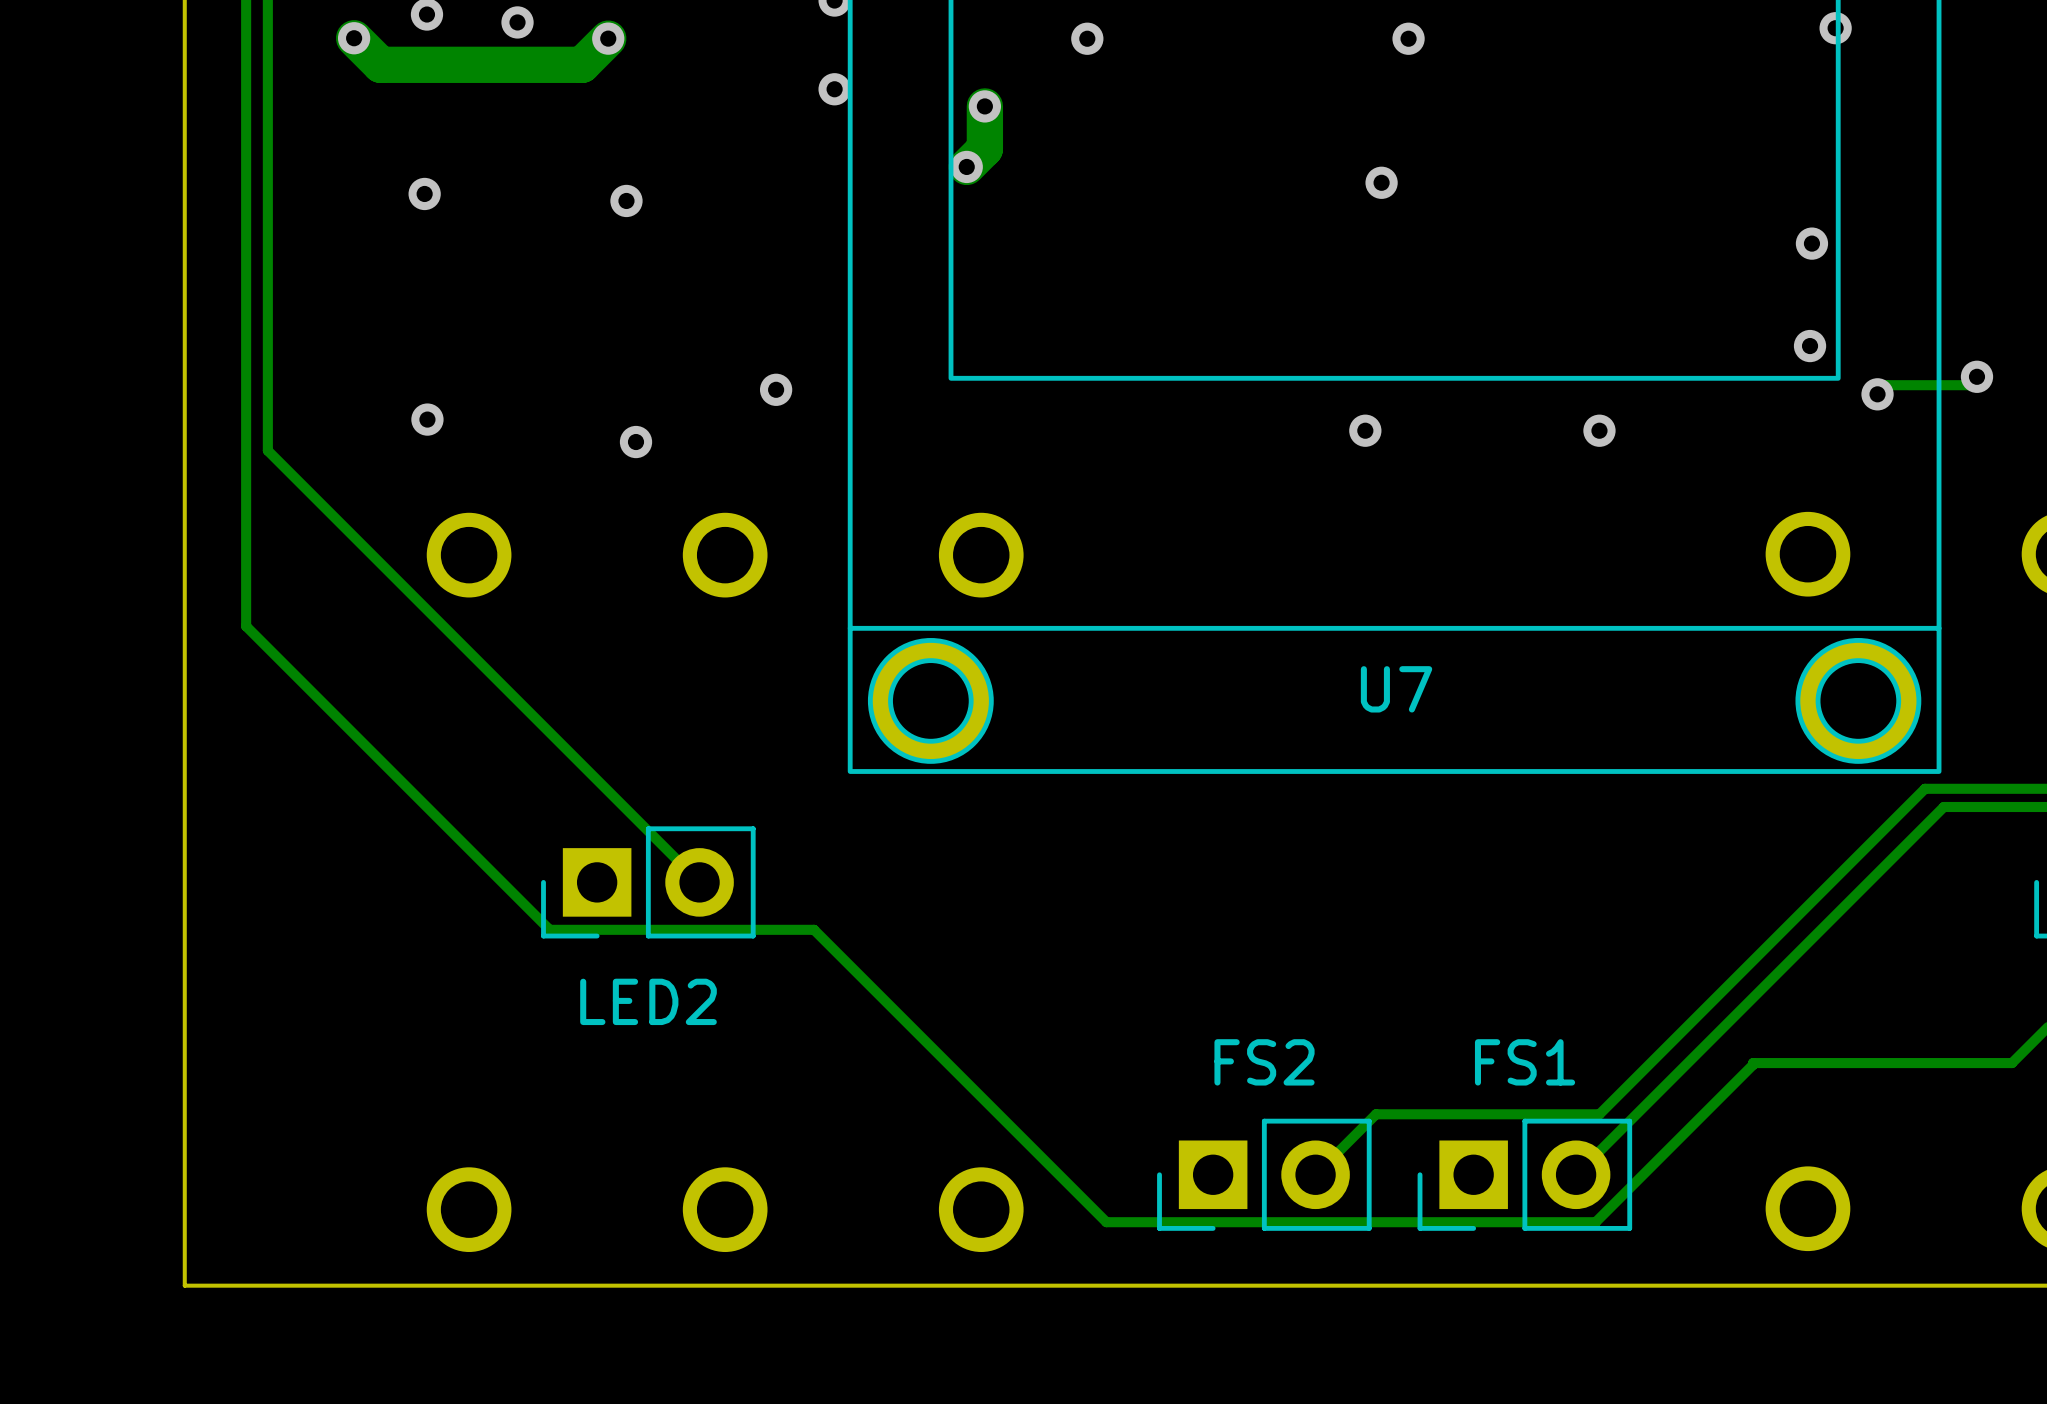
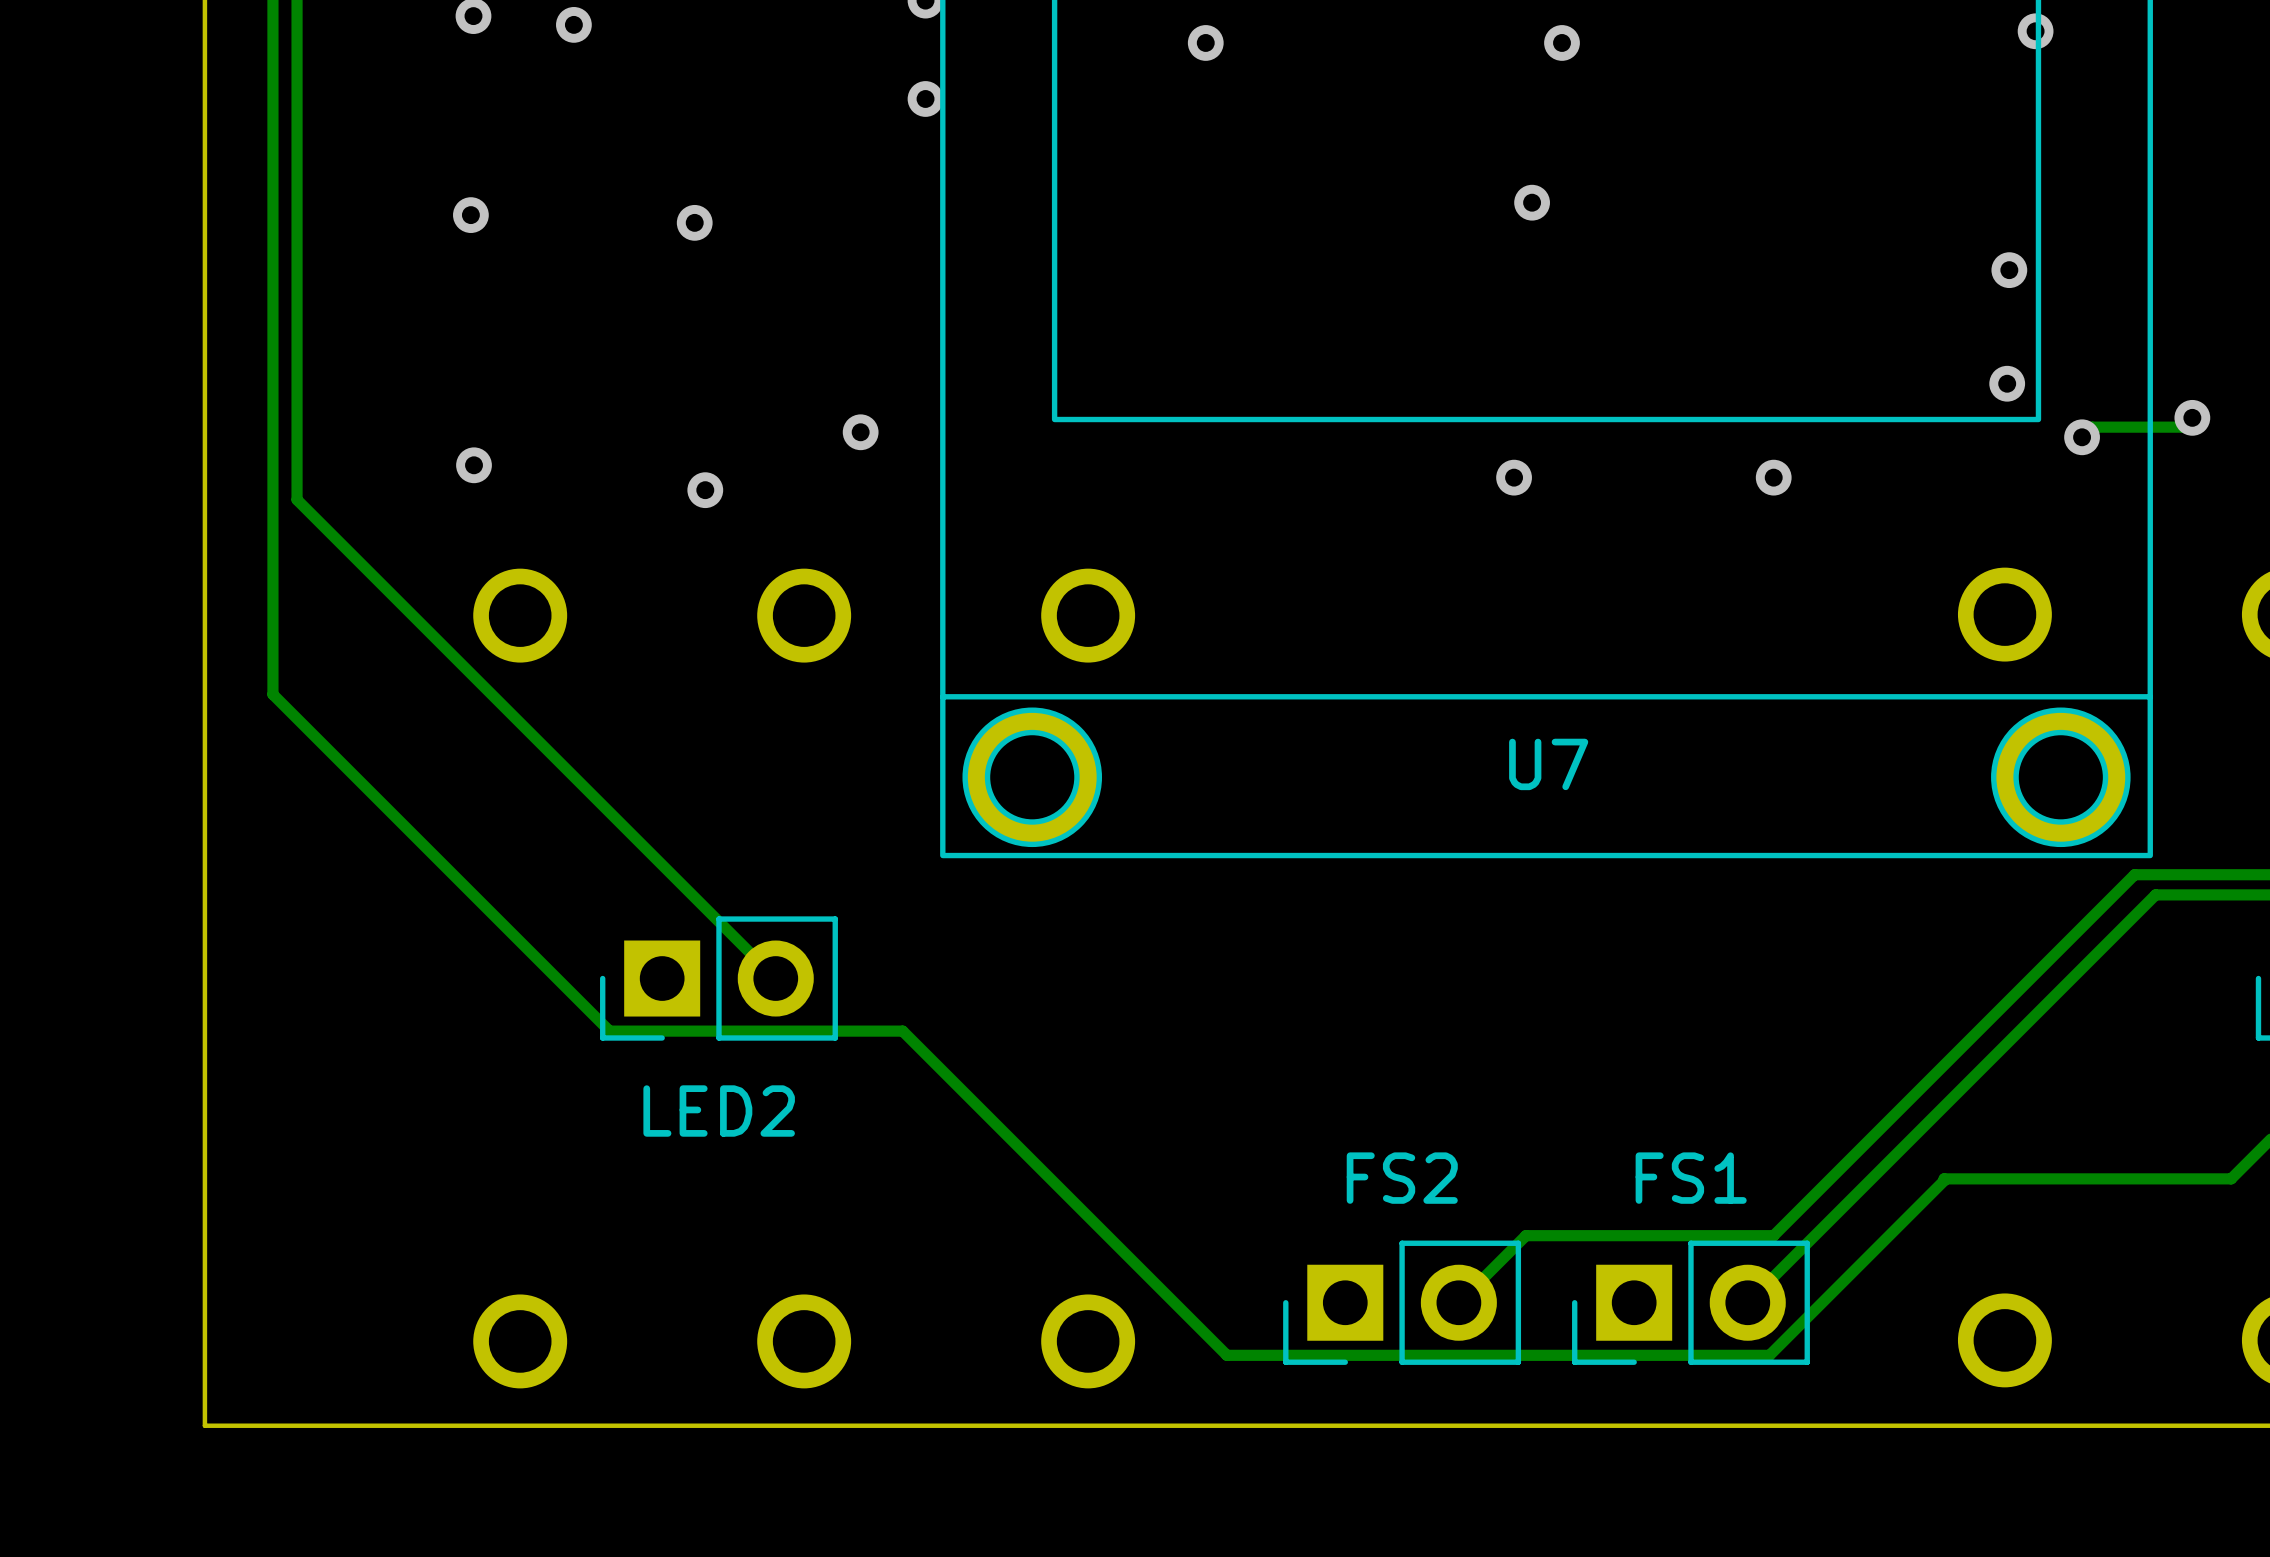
track: (354, 38) (380, 64) (582, 64) (608, 38) -> none
via: (354, 38) -> none
via: (608, 38) -> none
track: (984, 106) (984, 148) (966, 166) -> none
via: (984, 106) -> none
via: (966, 166) -> none

